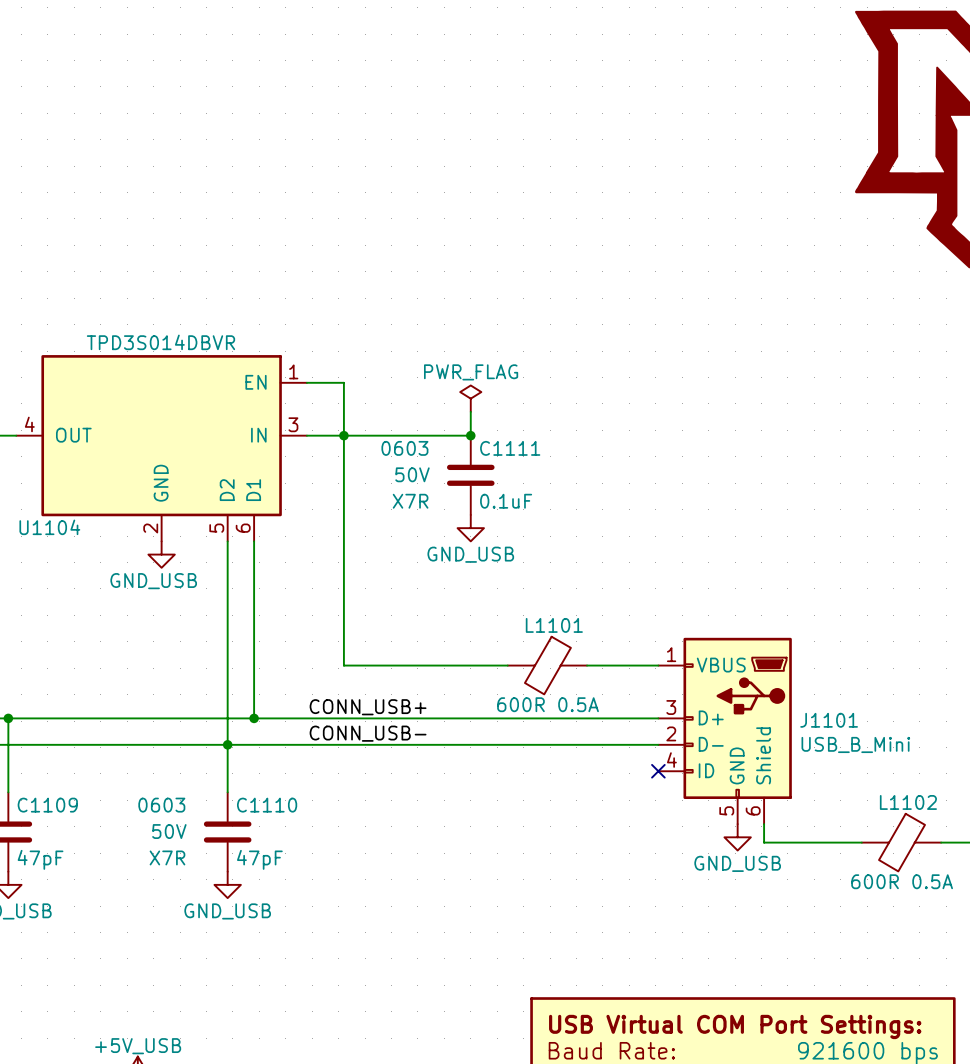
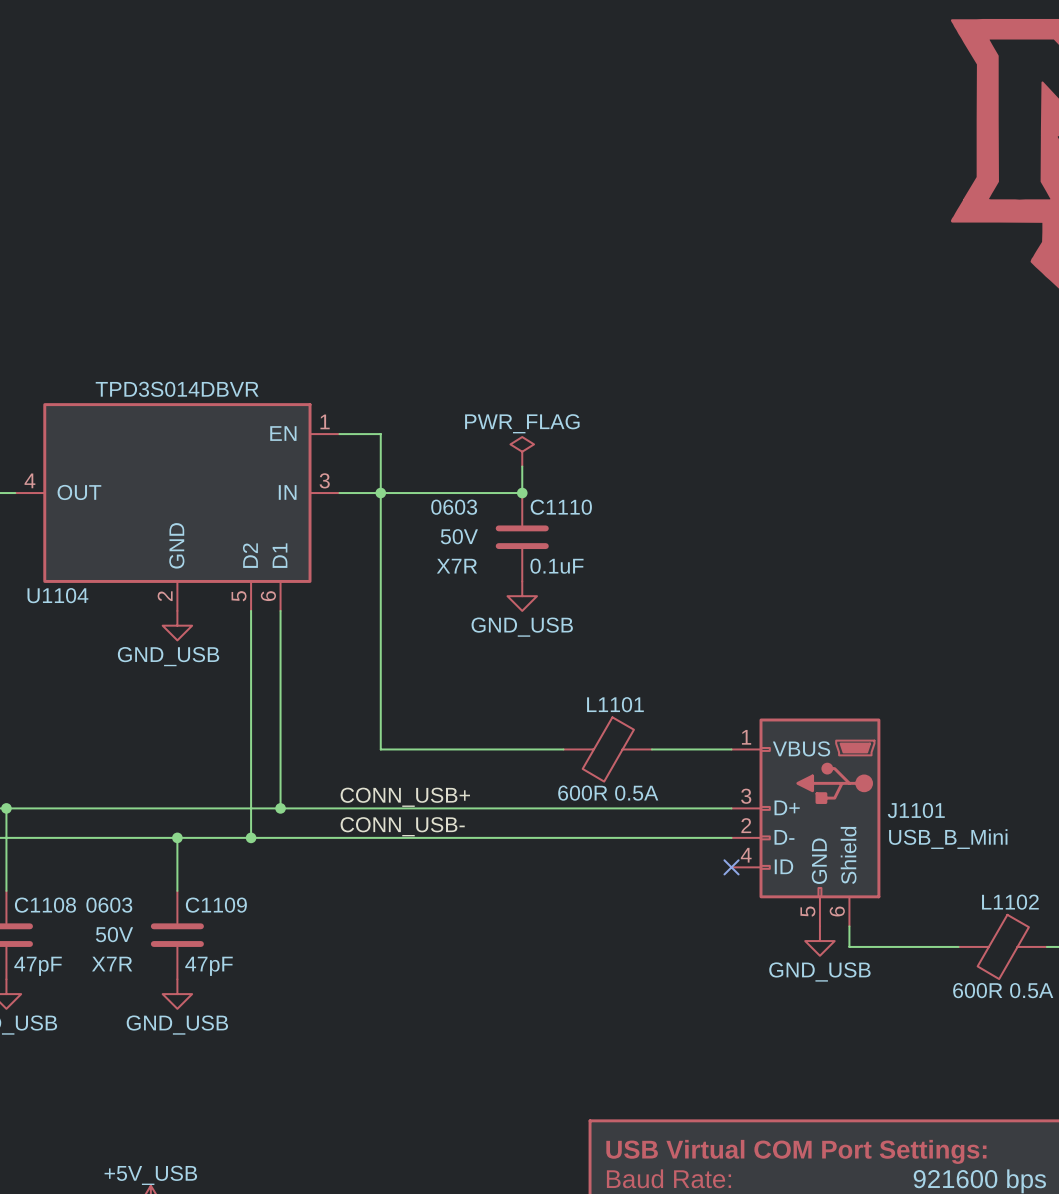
C1111 name: C1111 (510, 448) -> C1110 (561, 507)
junction: none -> (177, 837)
wire: (227, 744) (227, 792) -> (177, 837) (177, 890)
C1109 name: C1109 (47, 805) -> C1108 (45, 905)
C1109: none -> 47pF (177, 935)
C1110: 47pF (227, 832) -> none
power symbol position: GND_USB (227, 884) -> GND_USB (177, 994)

